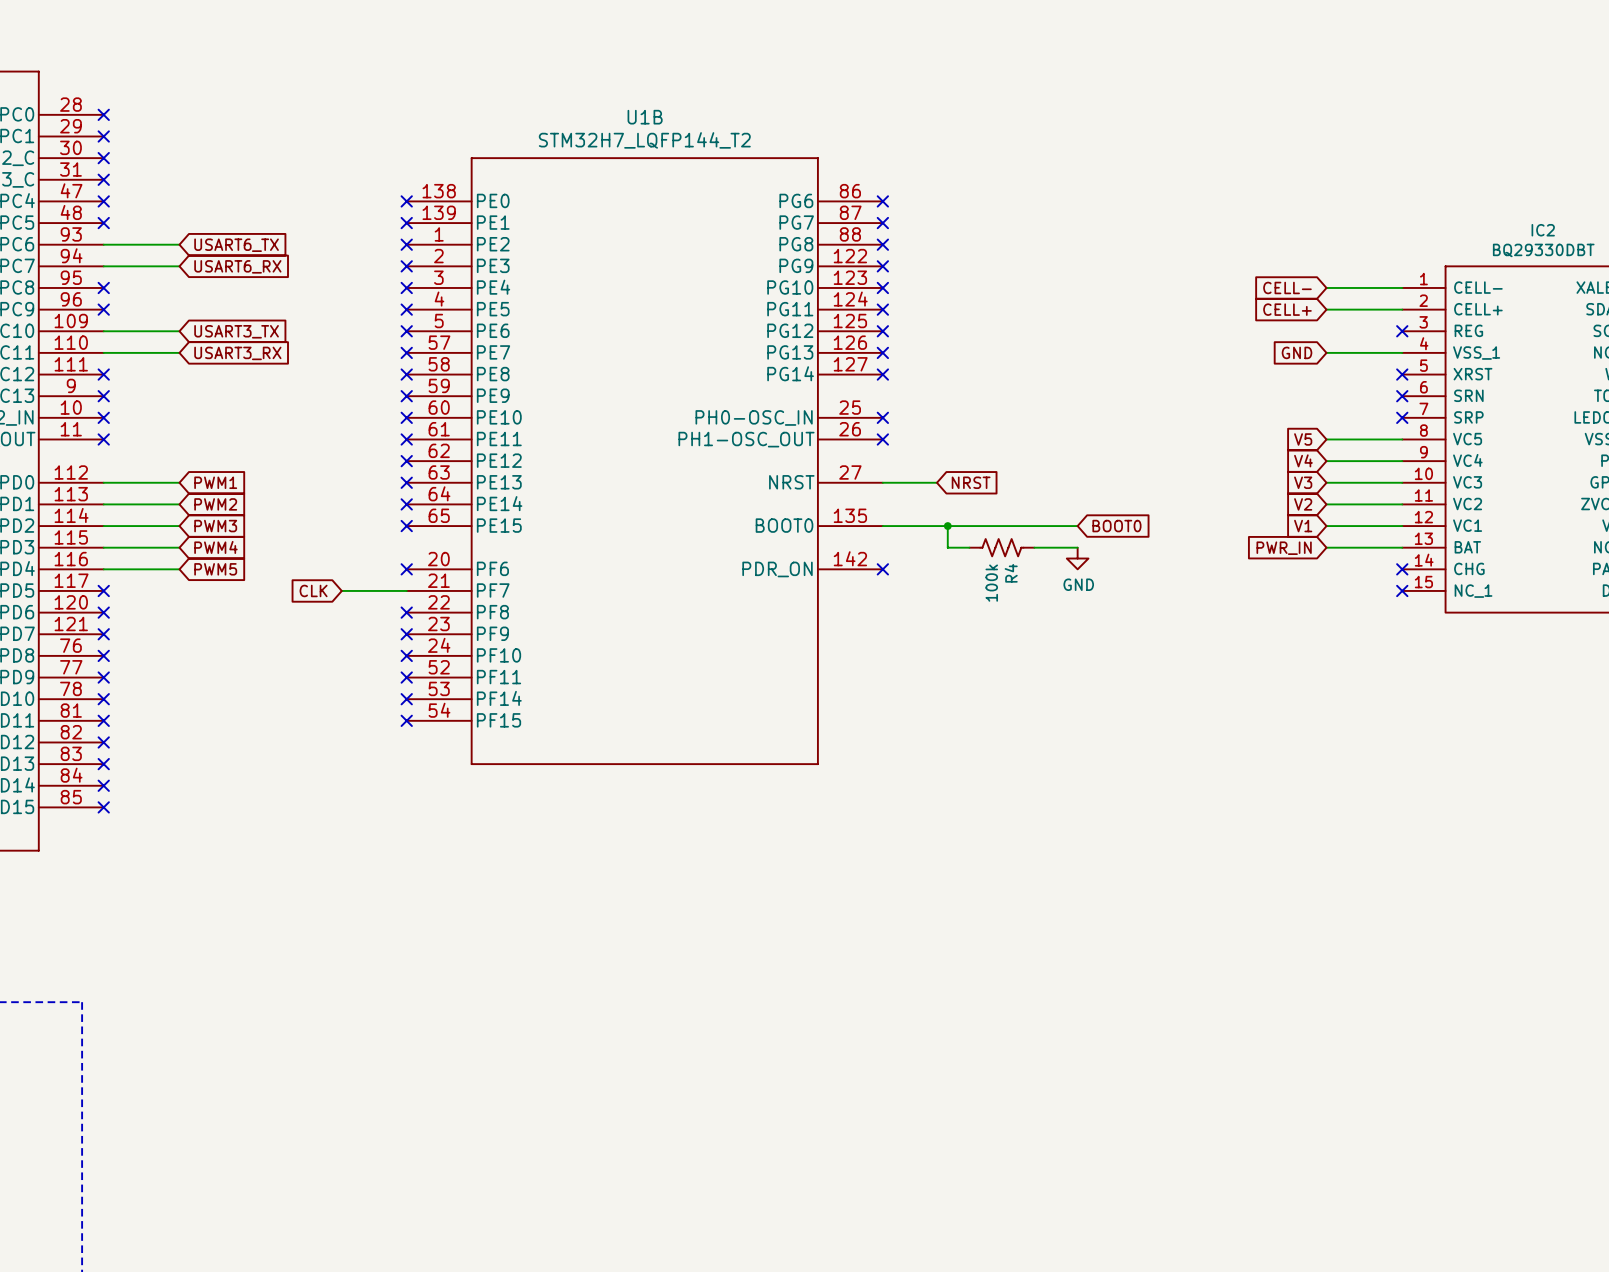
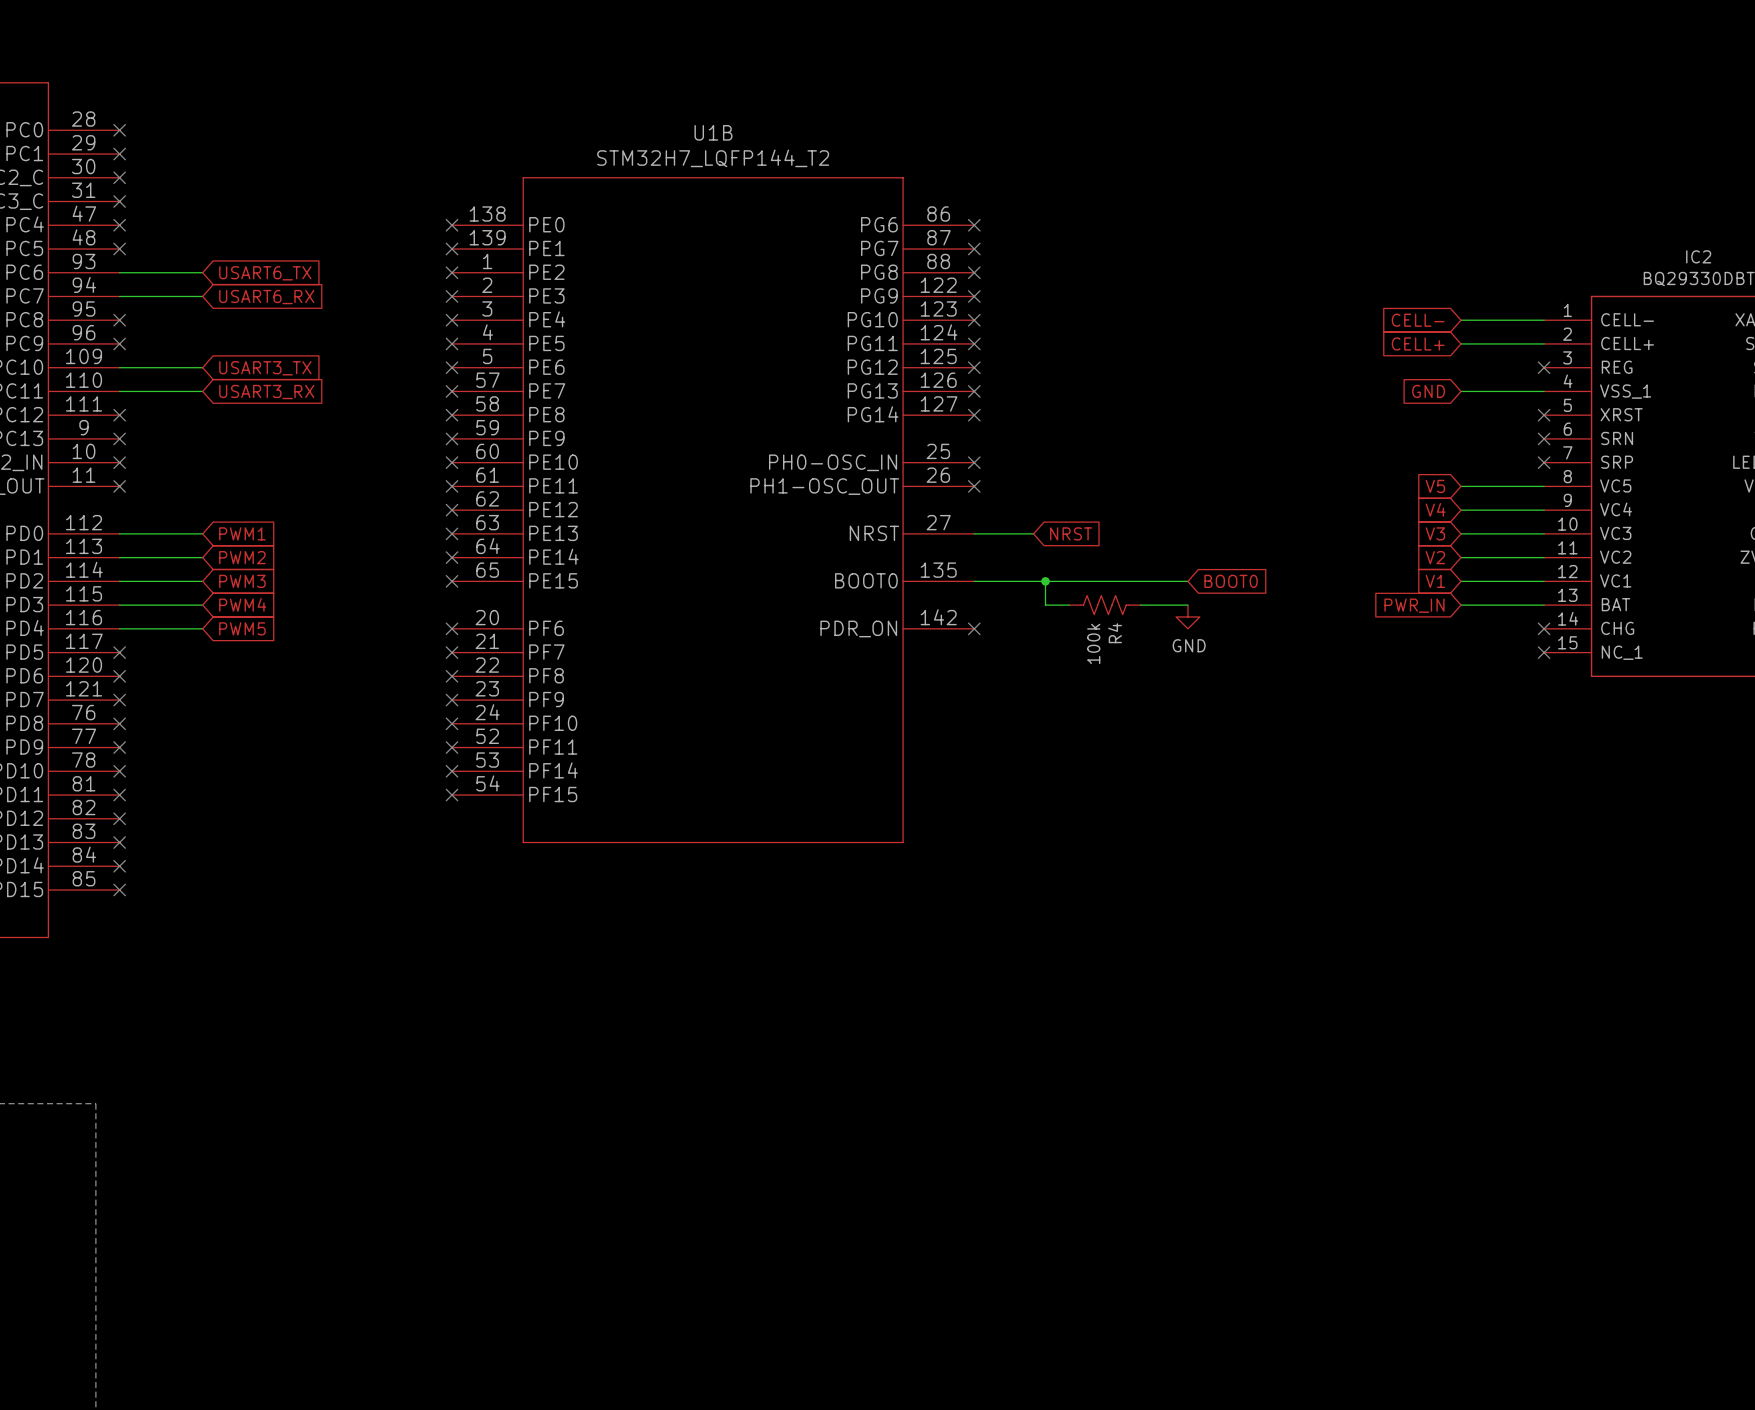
global label: CLK (313, 590) -> none
wire: (341, 590) (406, 590) -> none
no-connect mark: none -> (452, 652)

